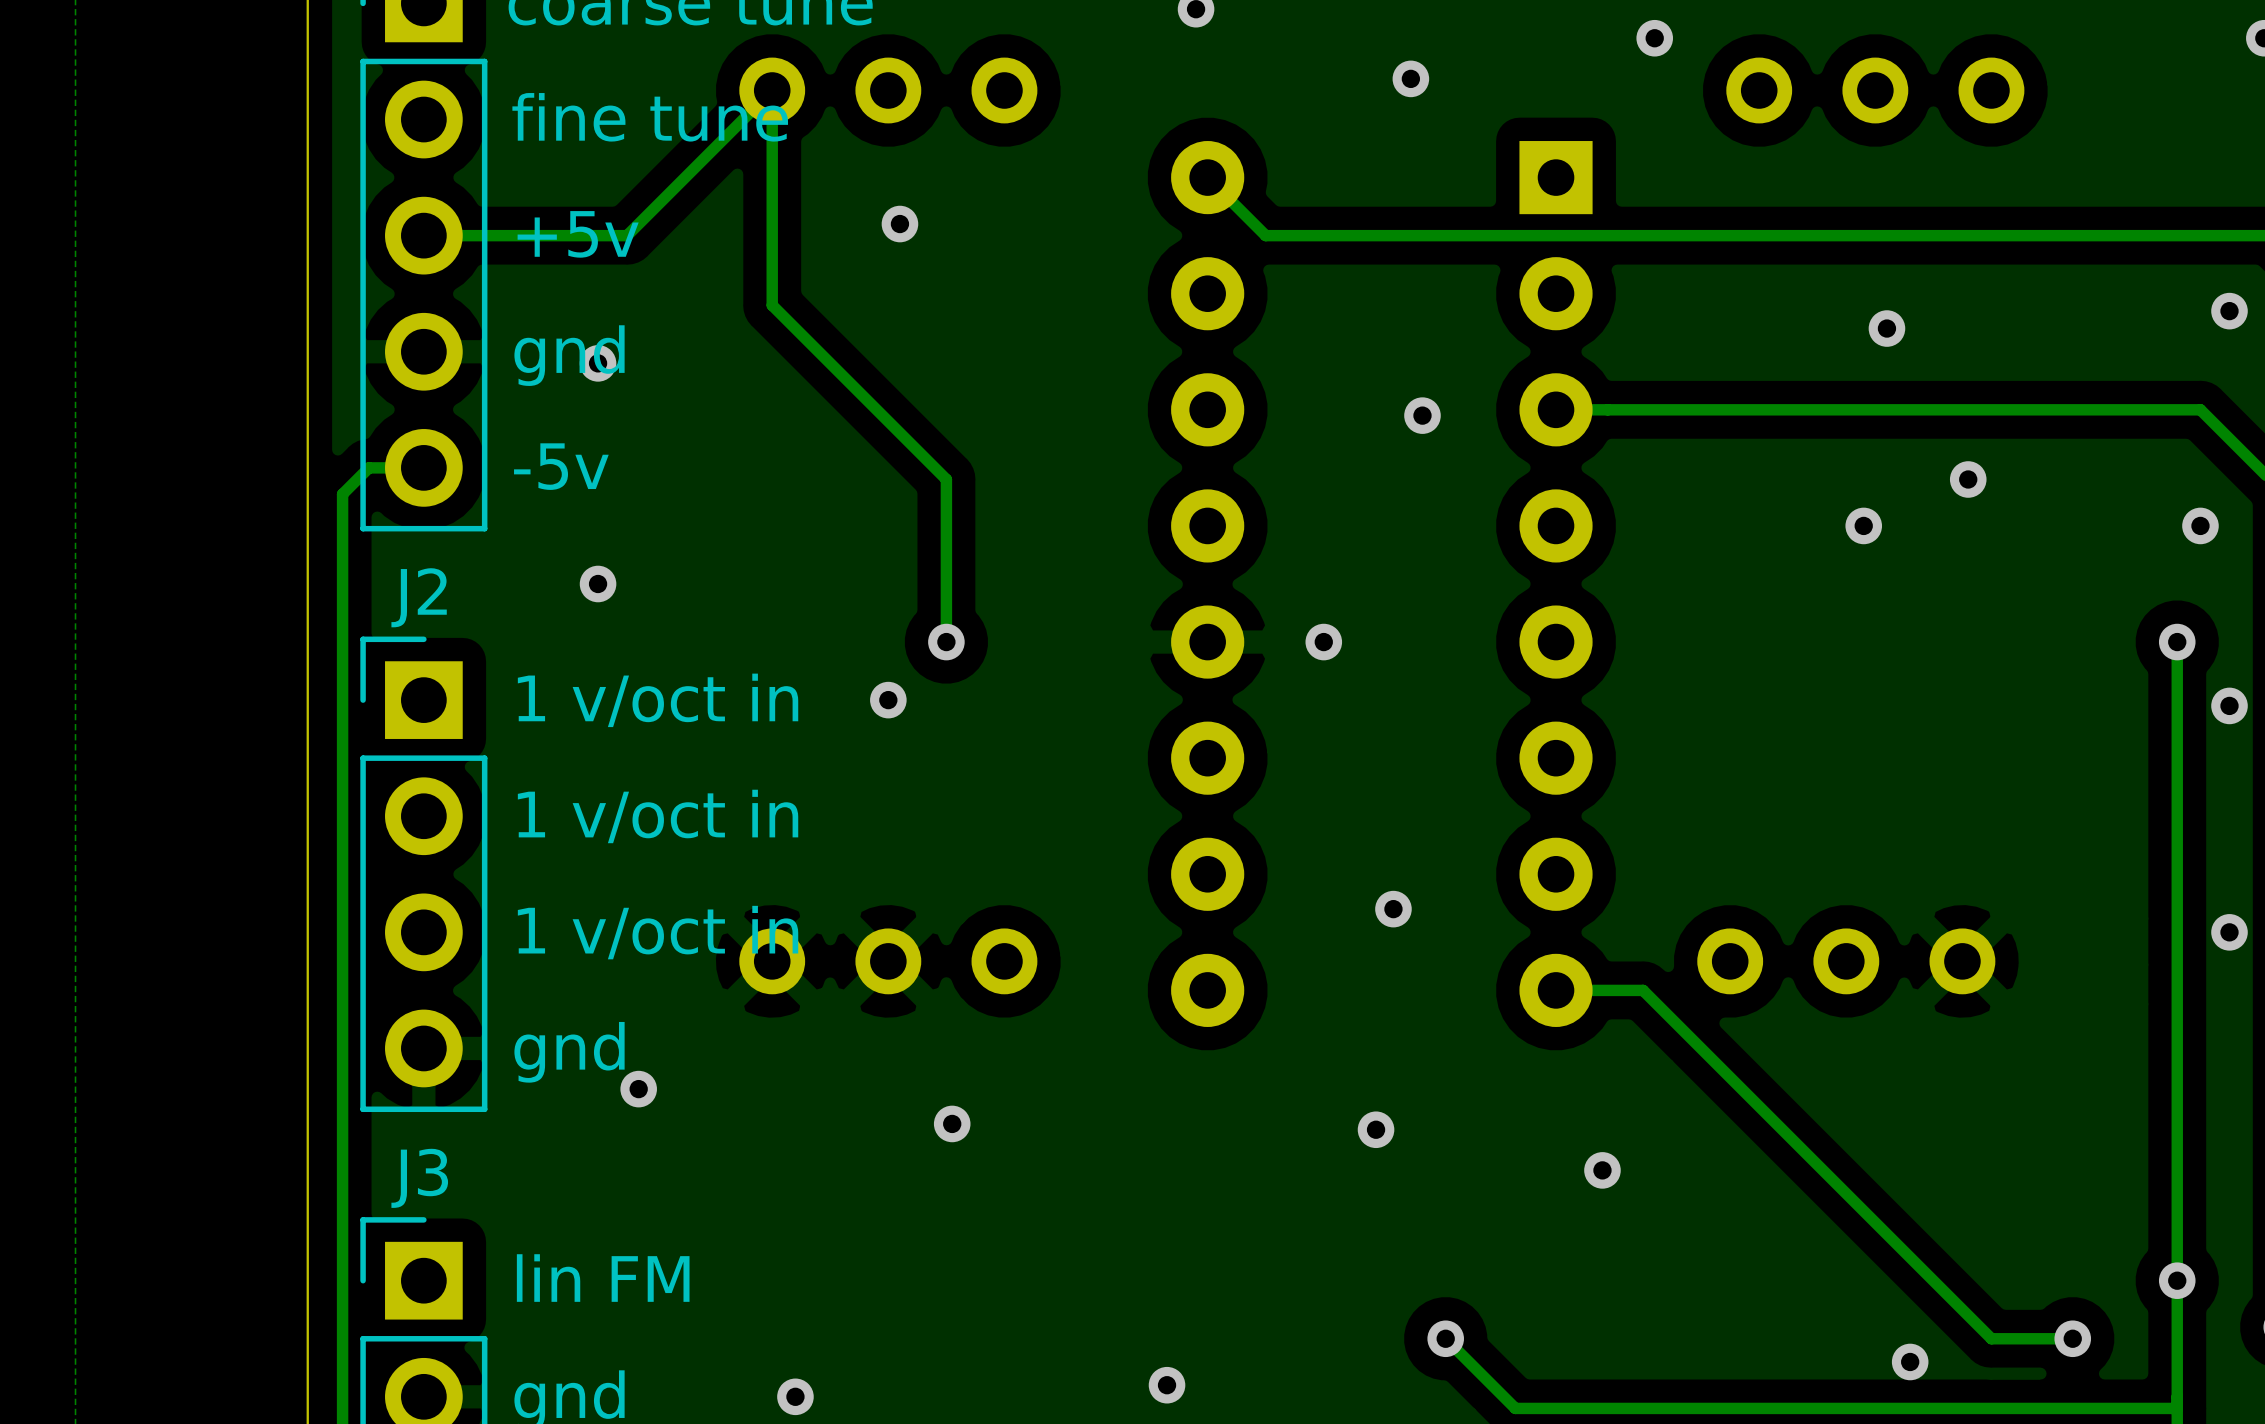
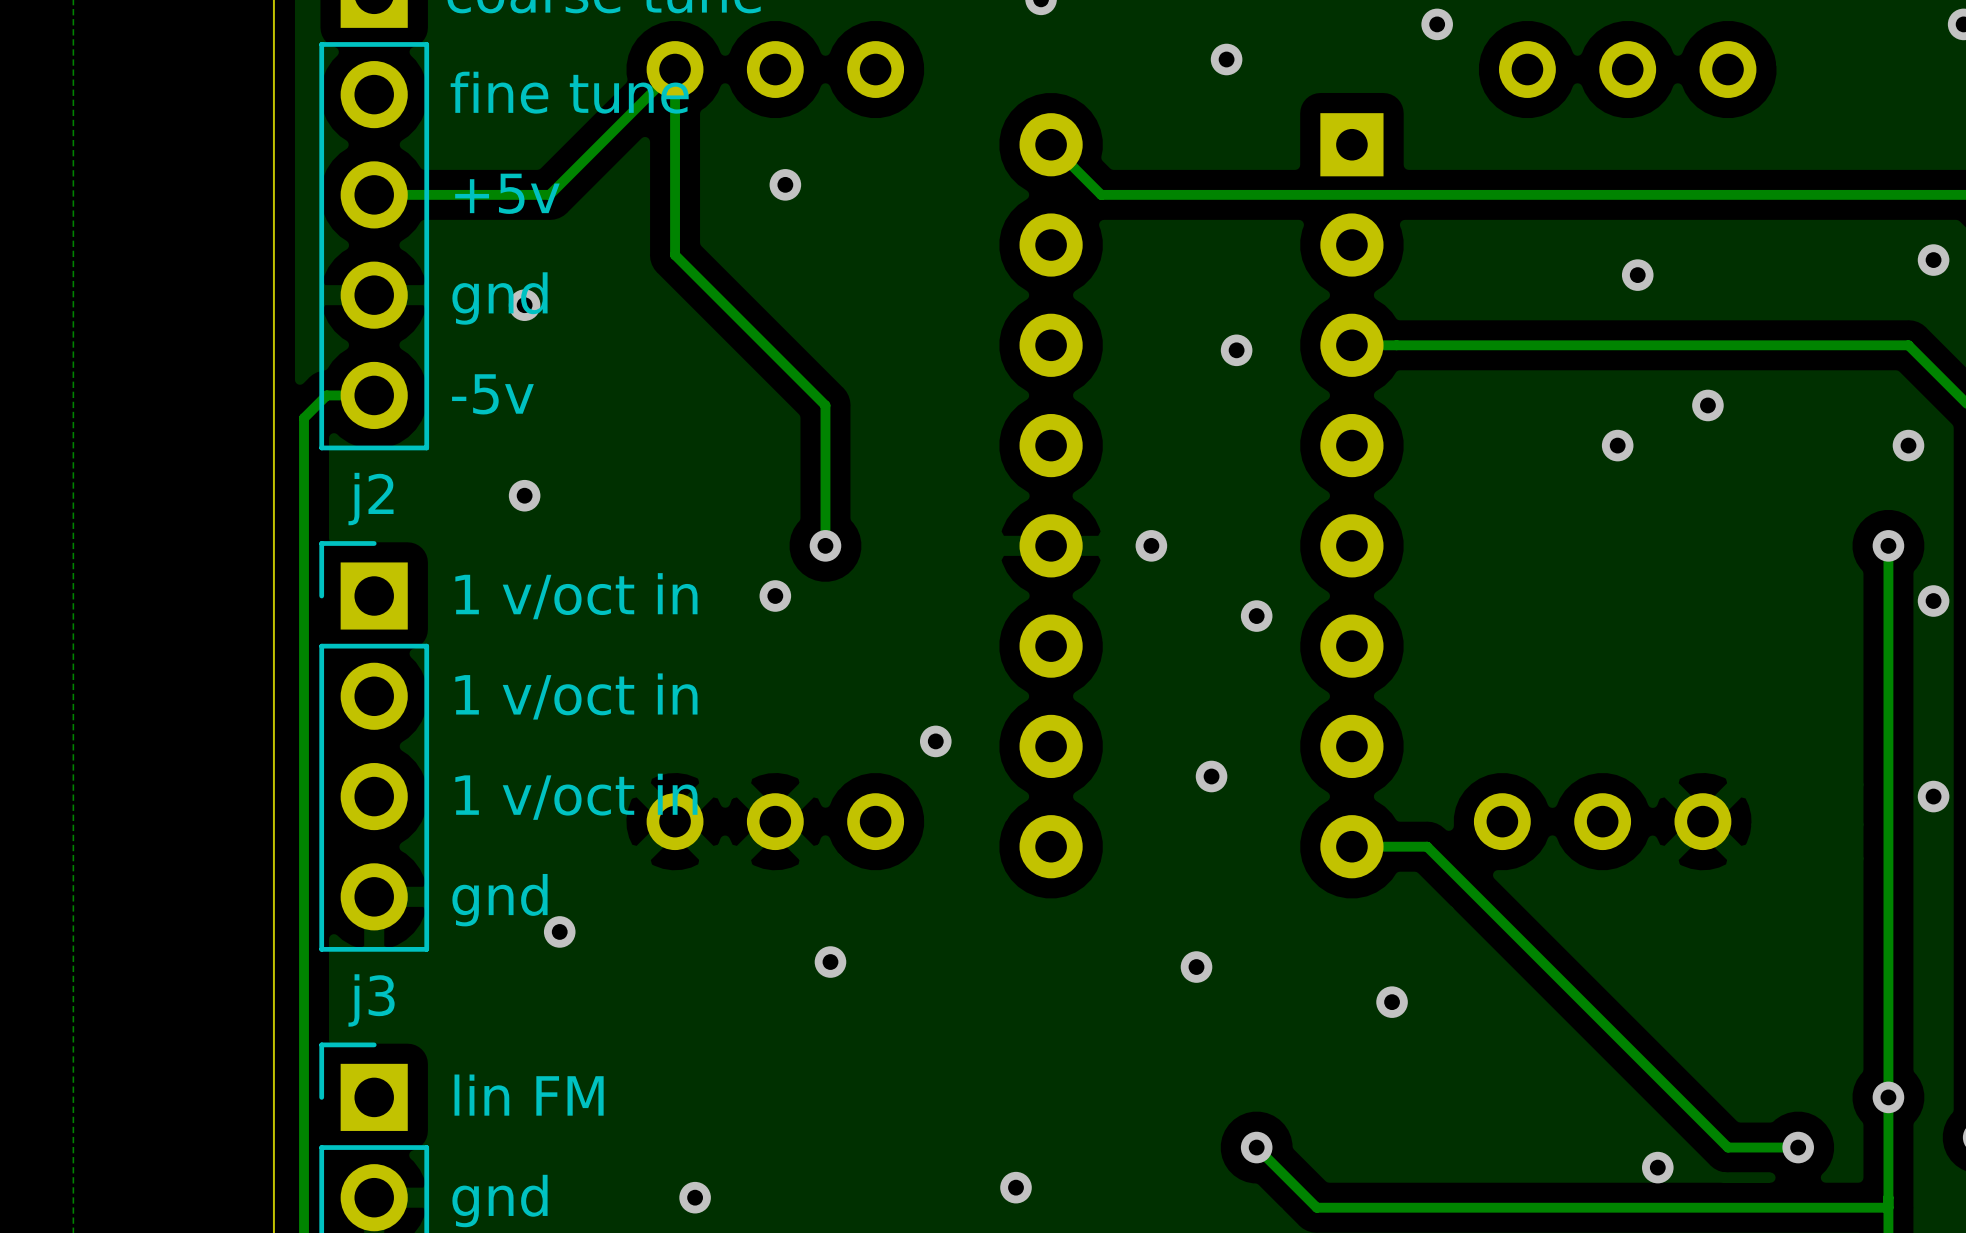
text: none -> j2 (371, 499)
J2 name: J2 (419, 597) -> none
via: none -> (1256, 616)
via: none -> (935, 741)
text: none -> j3 (371, 1000)
J3 name: J3 (419, 1178) -> none

